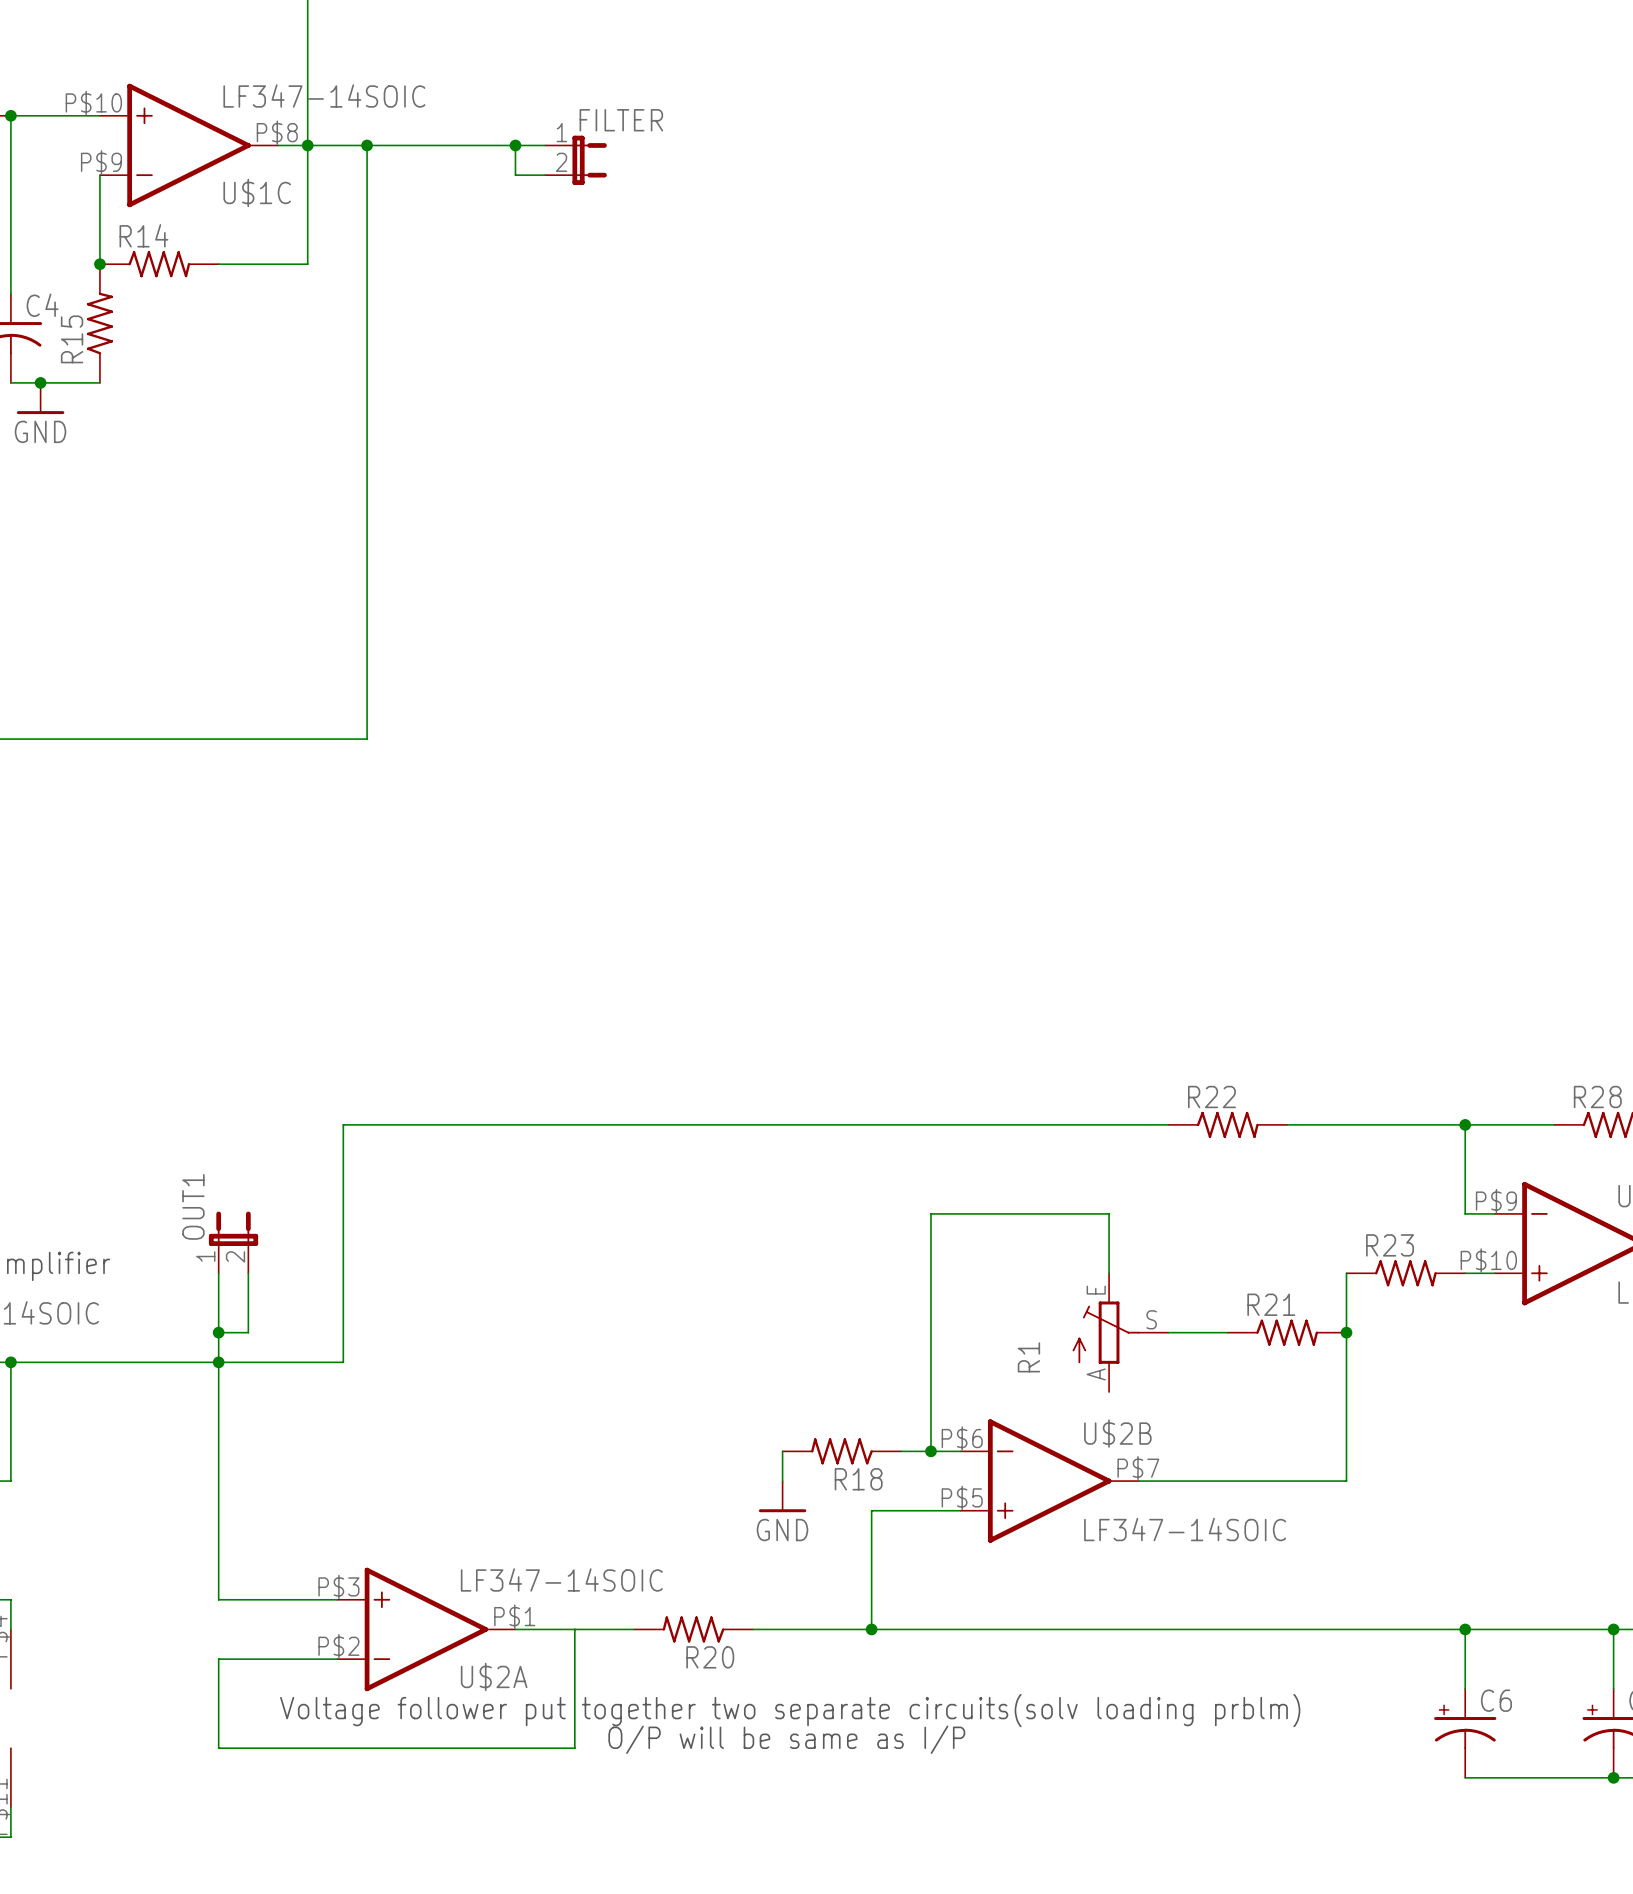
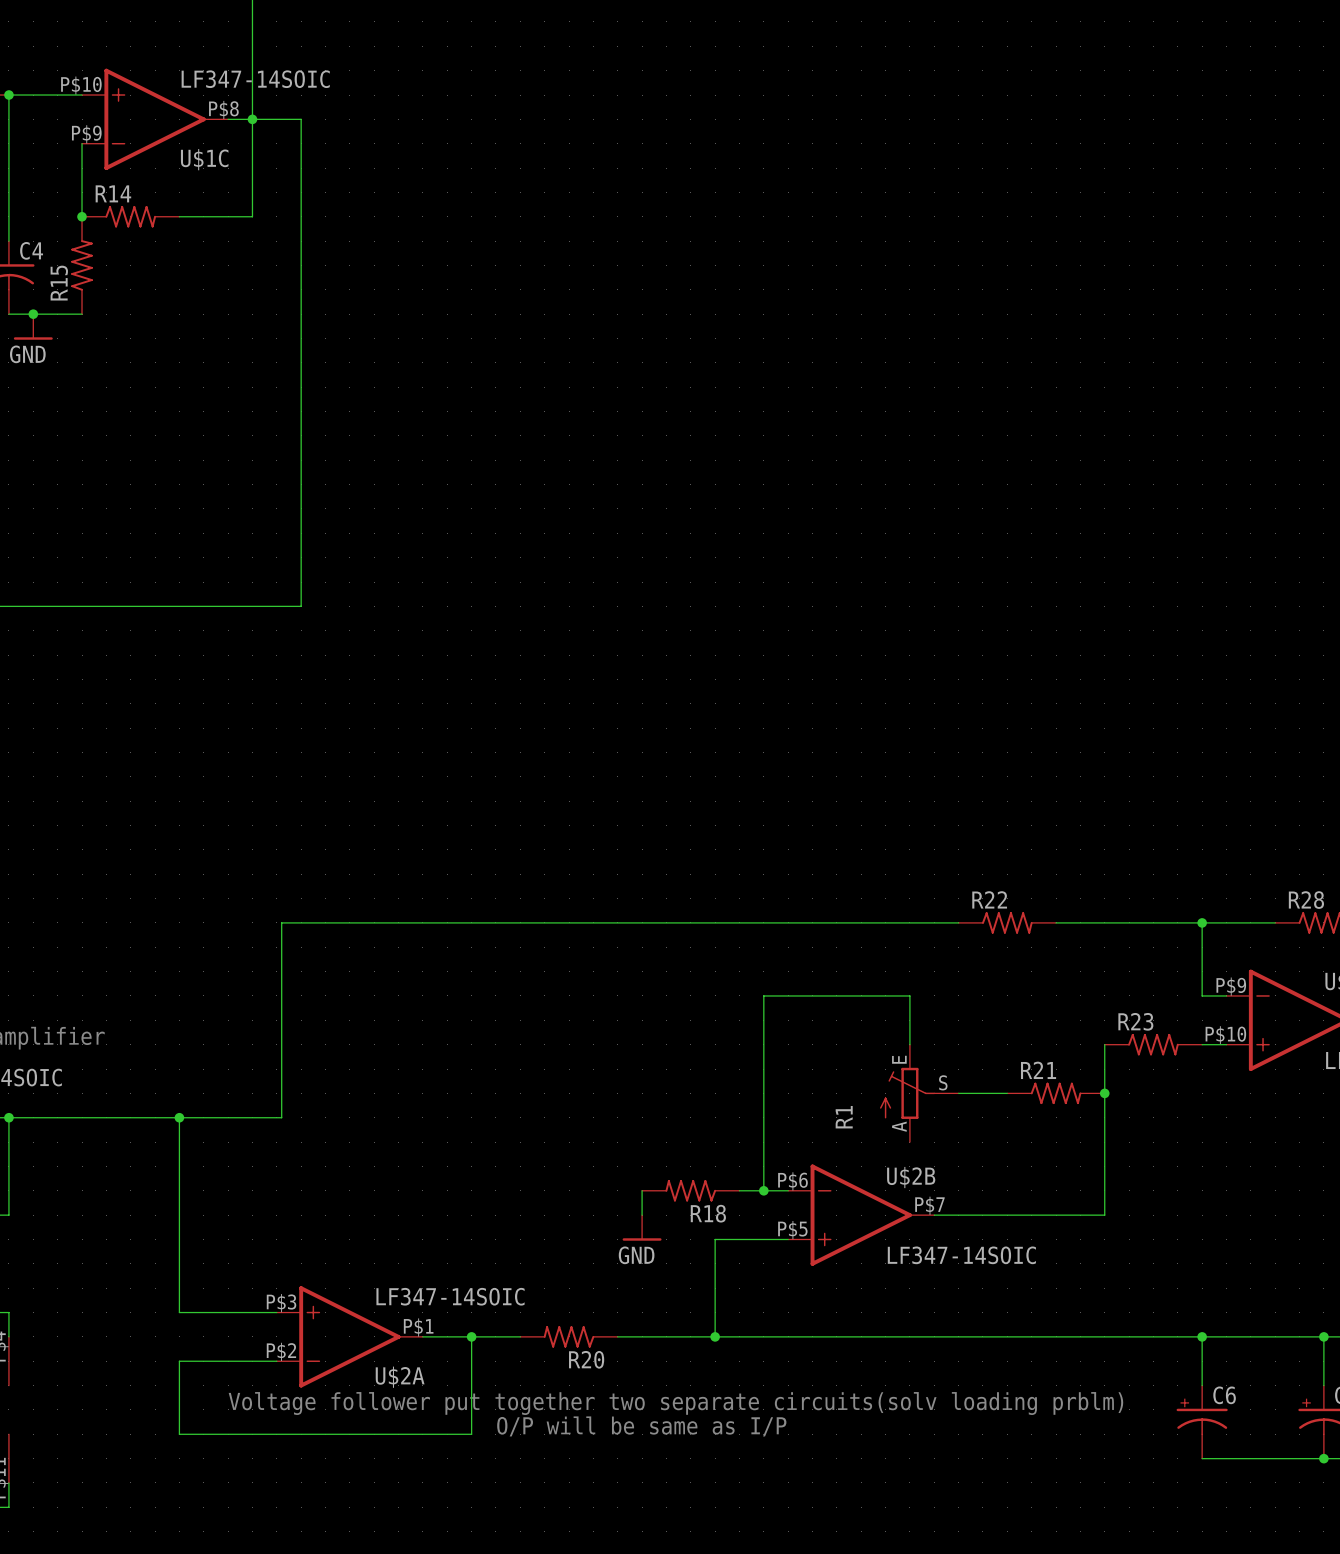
wire: (367, 145) (545, 145) -> none
junction: (367, 145) -> none
wire: (515, 145) (515, 175) (545, 175) -> none
junction: (515, 145) -> none
FILTER: (576, 160) -> none
OUT1: (233, 1242) -> none
wire: (218, 1273) (218, 1362) -> none
wire: (248, 1273) (248, 1332) (218, 1332) -> none
junction: (218, 1332) -> none
junction: none -> (471, 1336)

